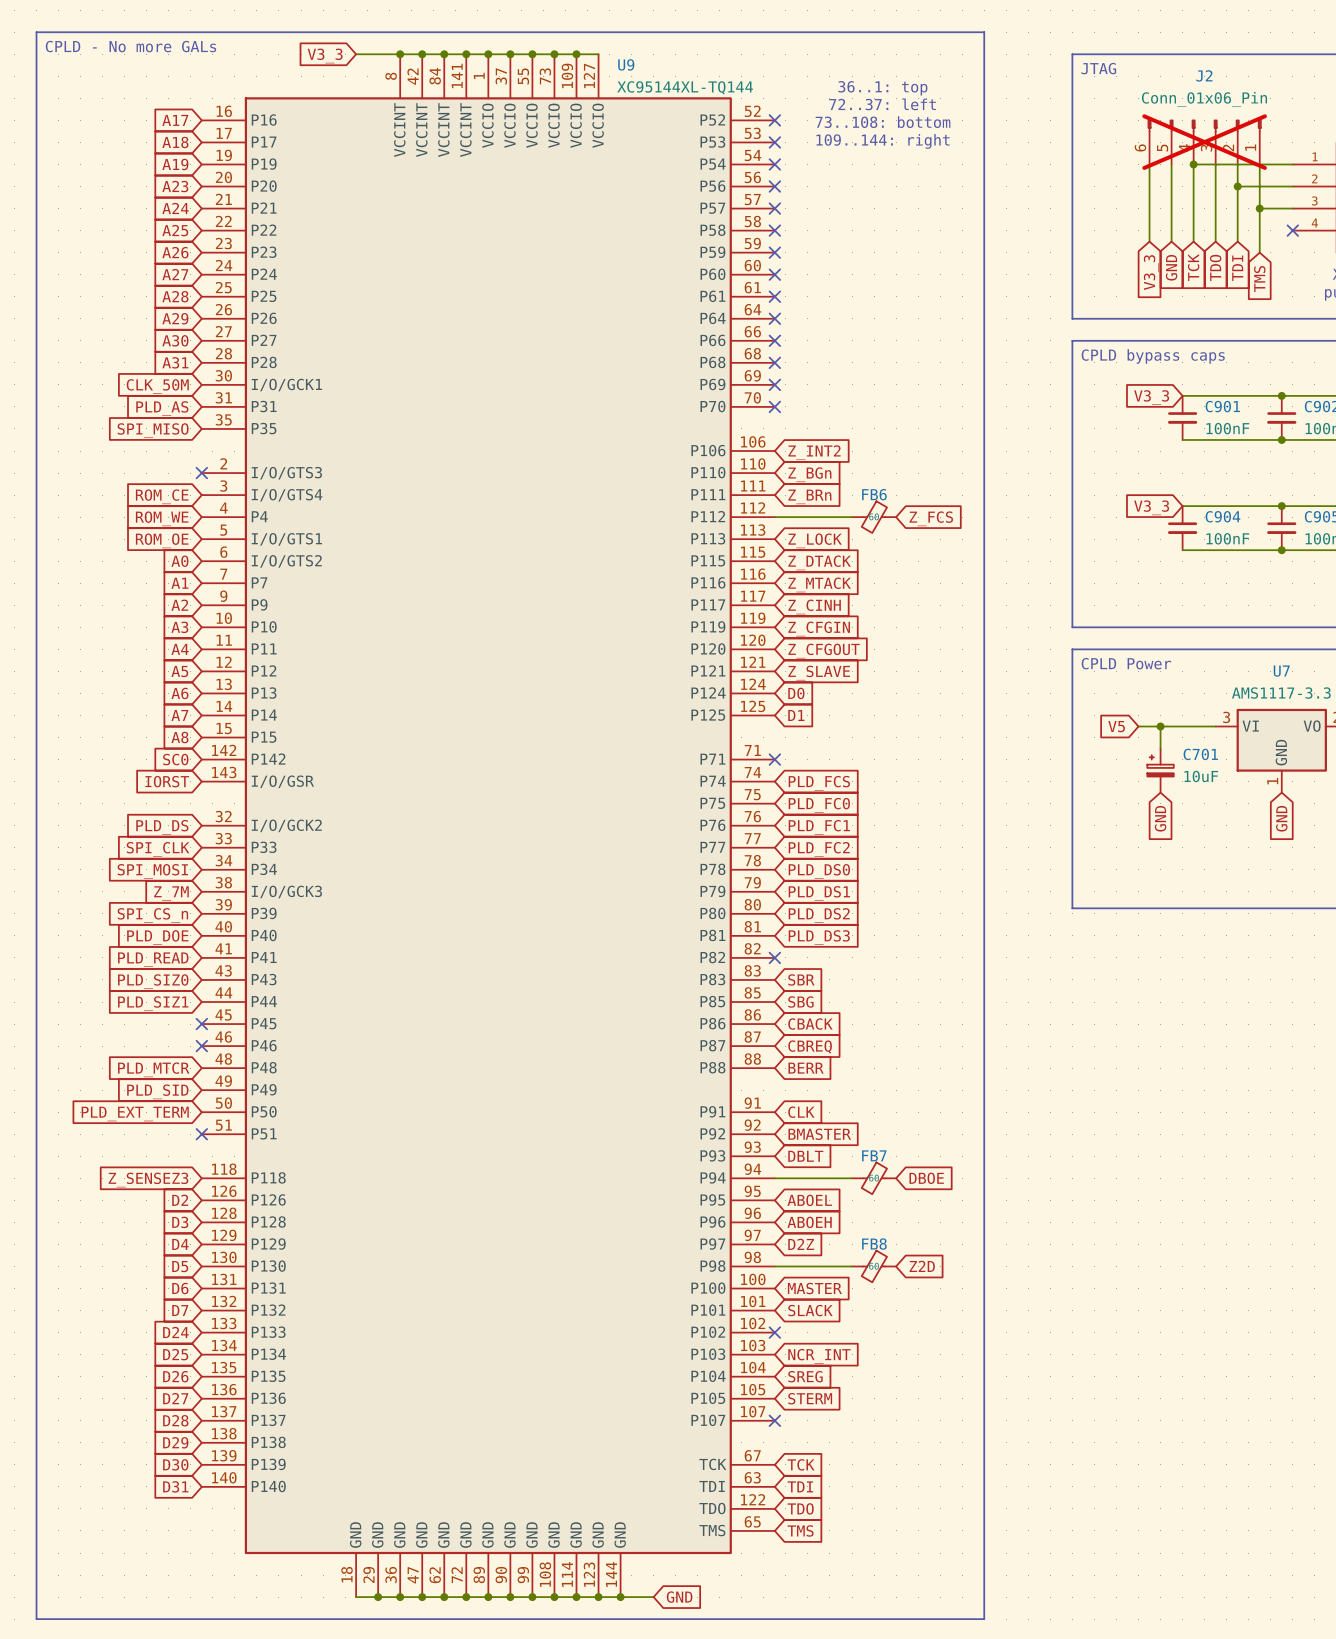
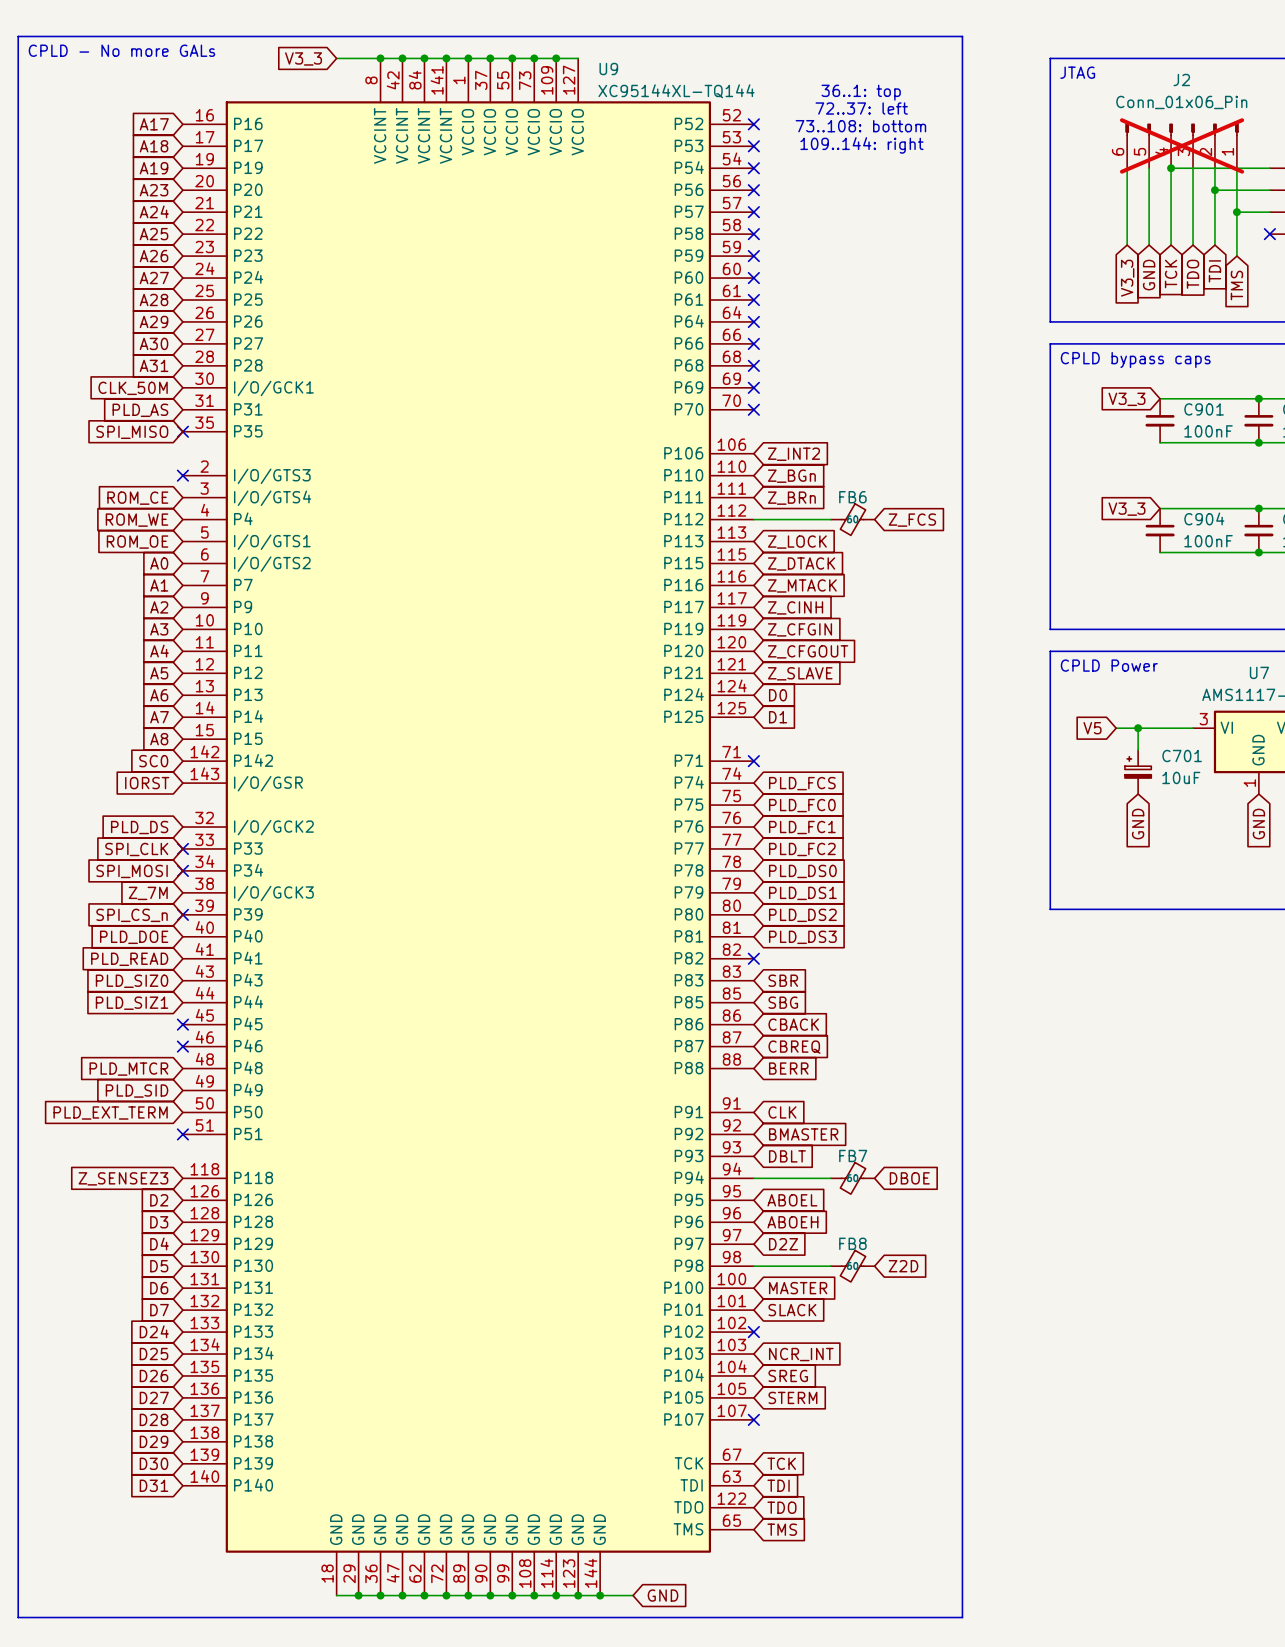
no-connect mark: none -> (182, 431)
no-connect mark: none -> (182, 848)
no-connect mark: none -> (182, 870)
no-connect mark: none -> (182, 914)

